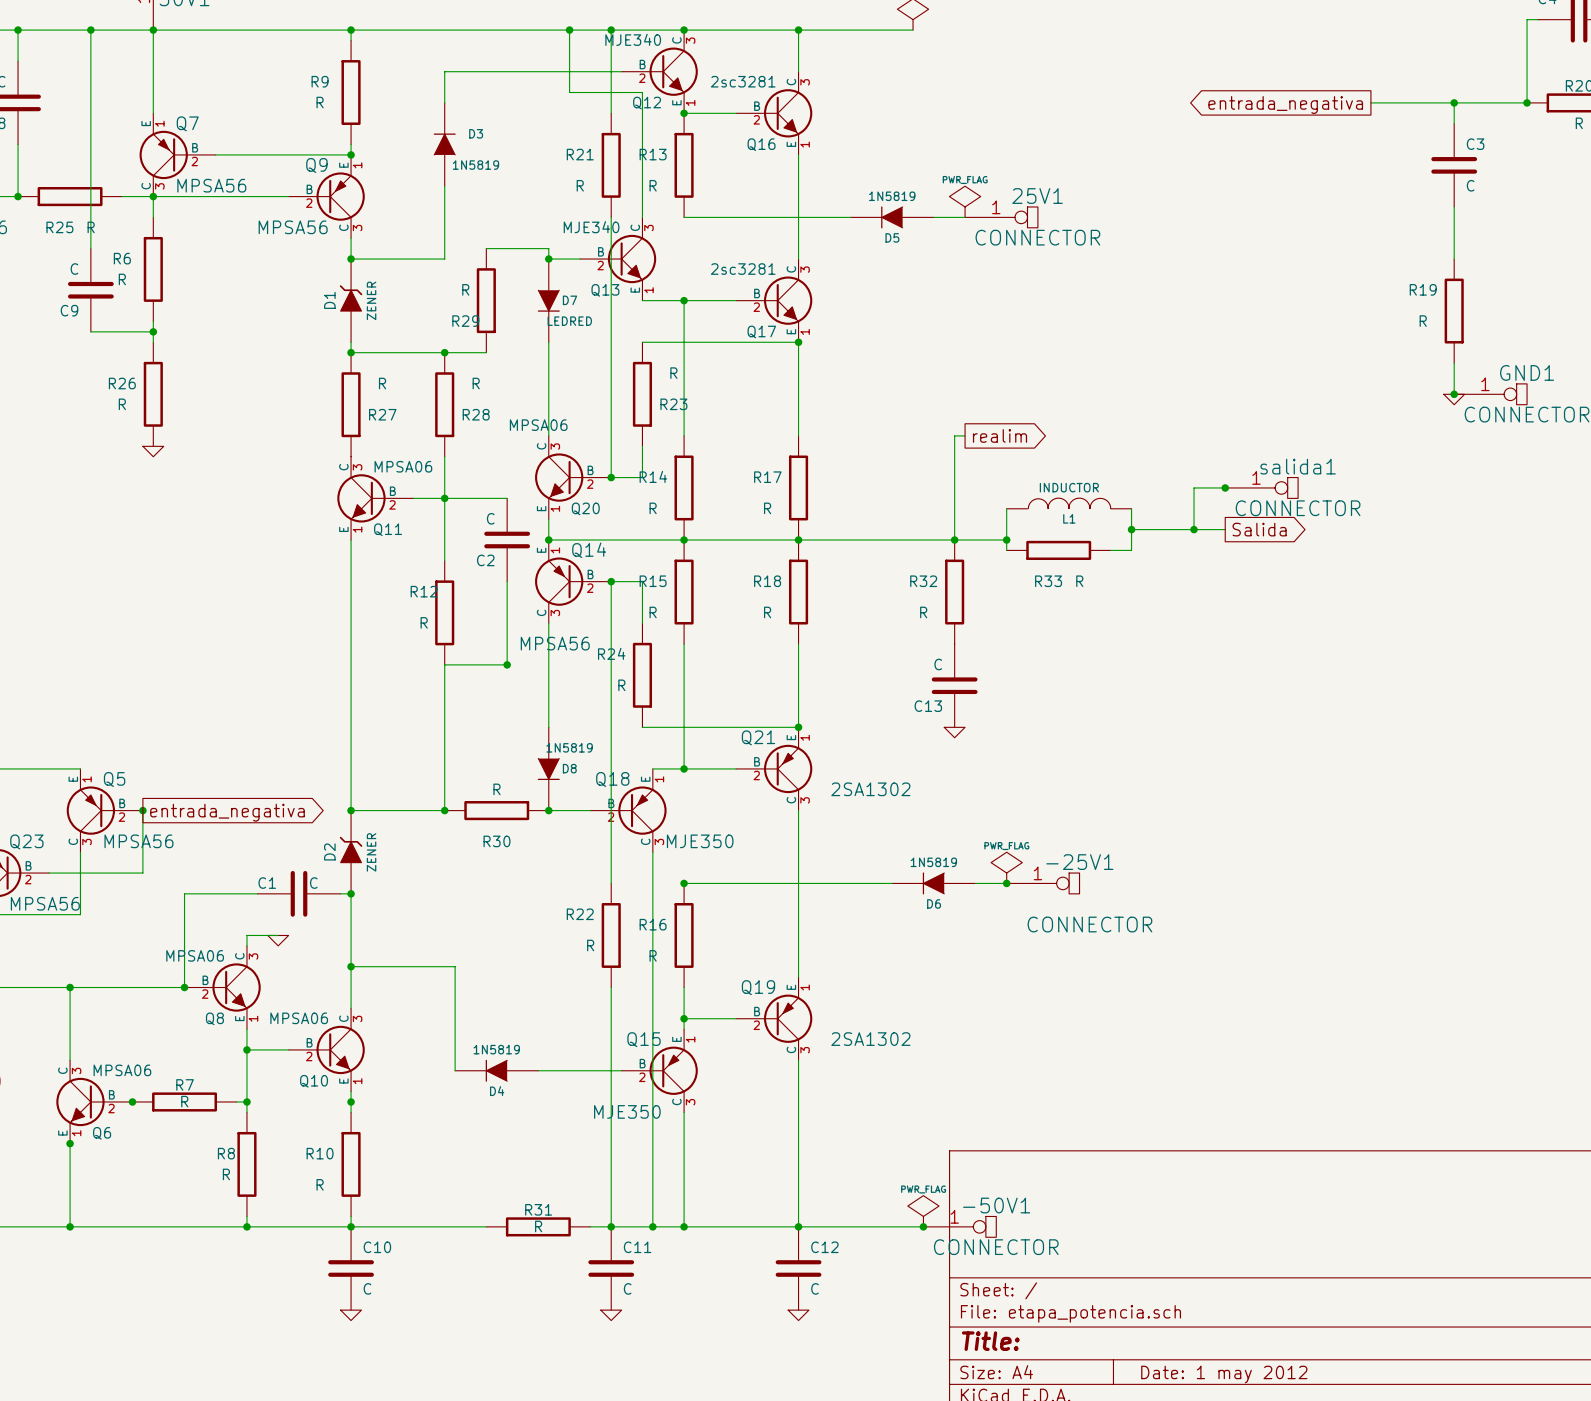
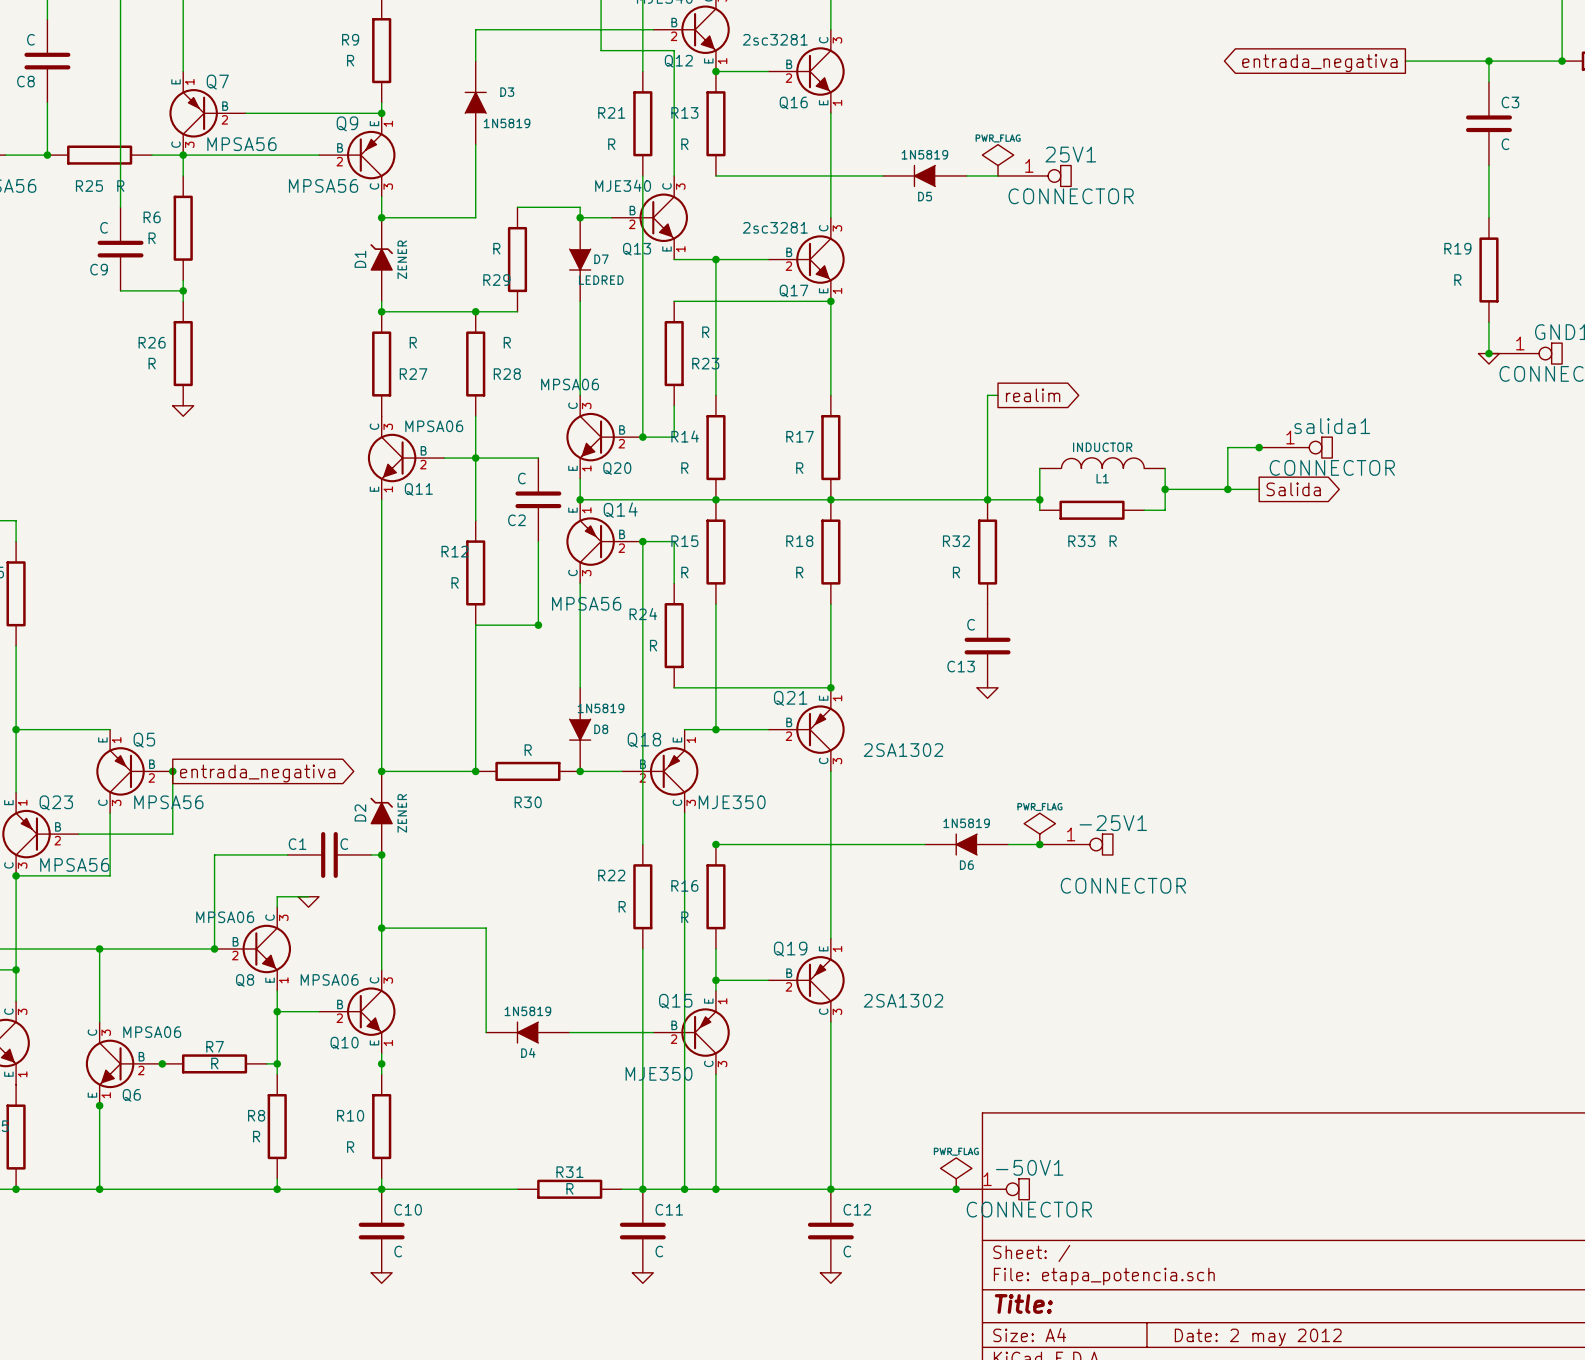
title block: Date: 1 may 2012 (1224, 1374) -> Date: 2 may 2012 (1258, 1337)

